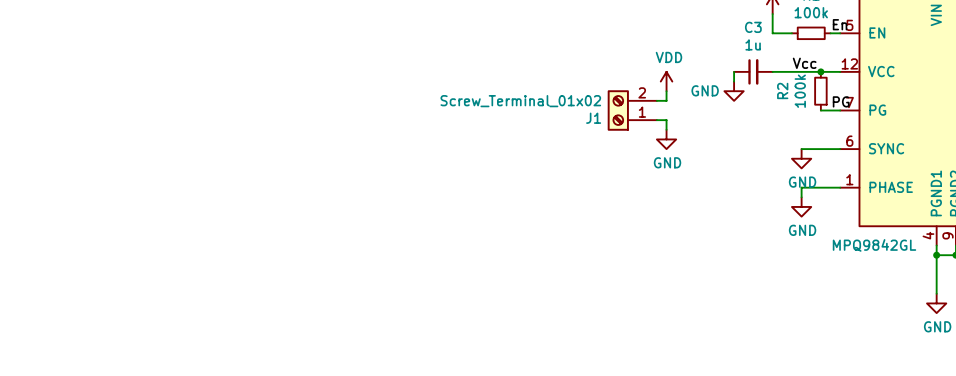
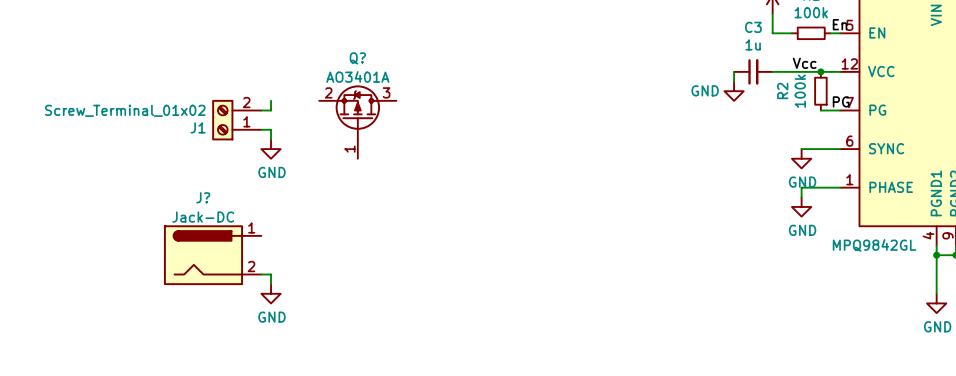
power symbol: VDD (666, 81) -> none
wire: (666, 91) (666, 100) (656, 100) -> none
wire: none -> (271, 100) (271, 110) (261, 110)
J1 position: (632, 110) -> (236, 120)
wire: (656, 120) (666, 120) (666, 129) -> none
Q?: none -> AO3401A (357, 122)
wire: none -> (261, 129) (271, 129) (271, 139)
power symbol: GND (666, 139) -> none
power symbol: none -> GND (271, 149)
J?: none -> Jack-DC (212, 255)
wire: none -> (261, 274) (271, 274) (271, 284)
power symbol: none -> GND (271, 293)

